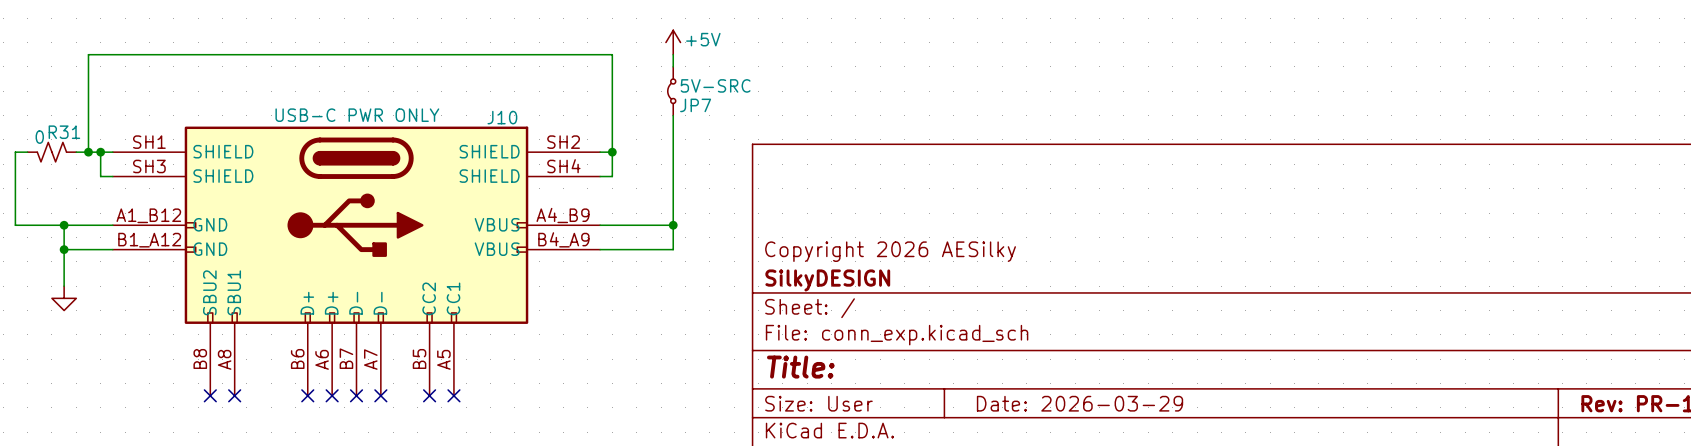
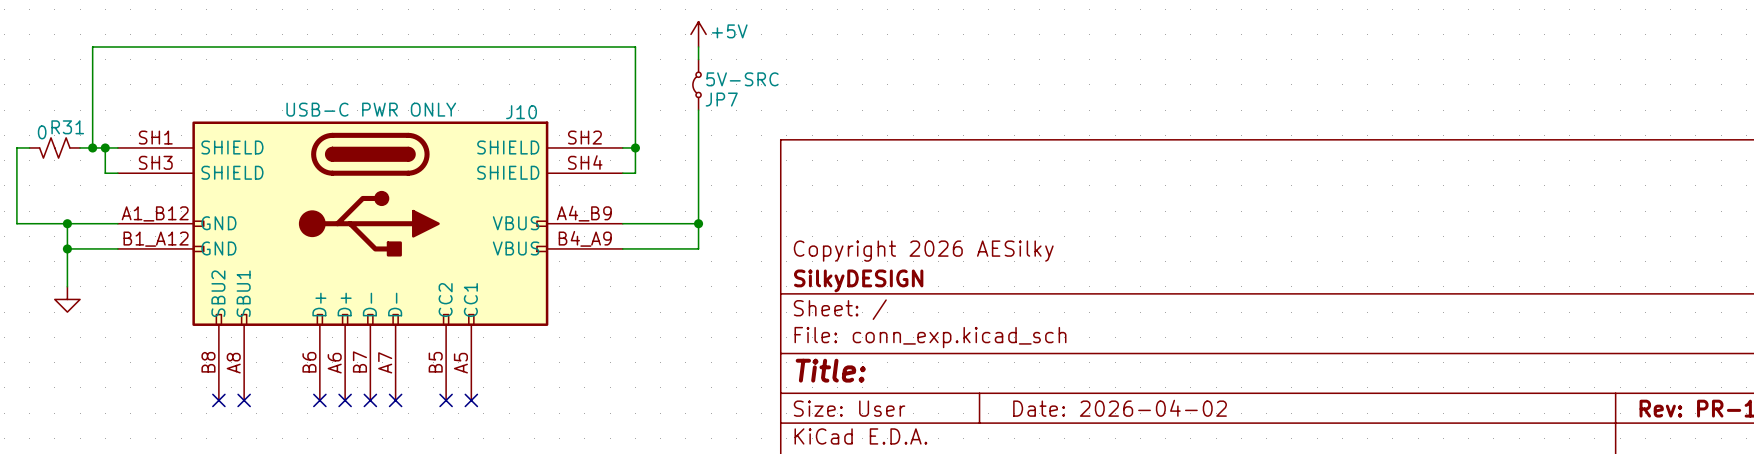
title block: Date: 2026-03-29 (1080, 403) -> Date: 2026-04-02 (1120, 408)

